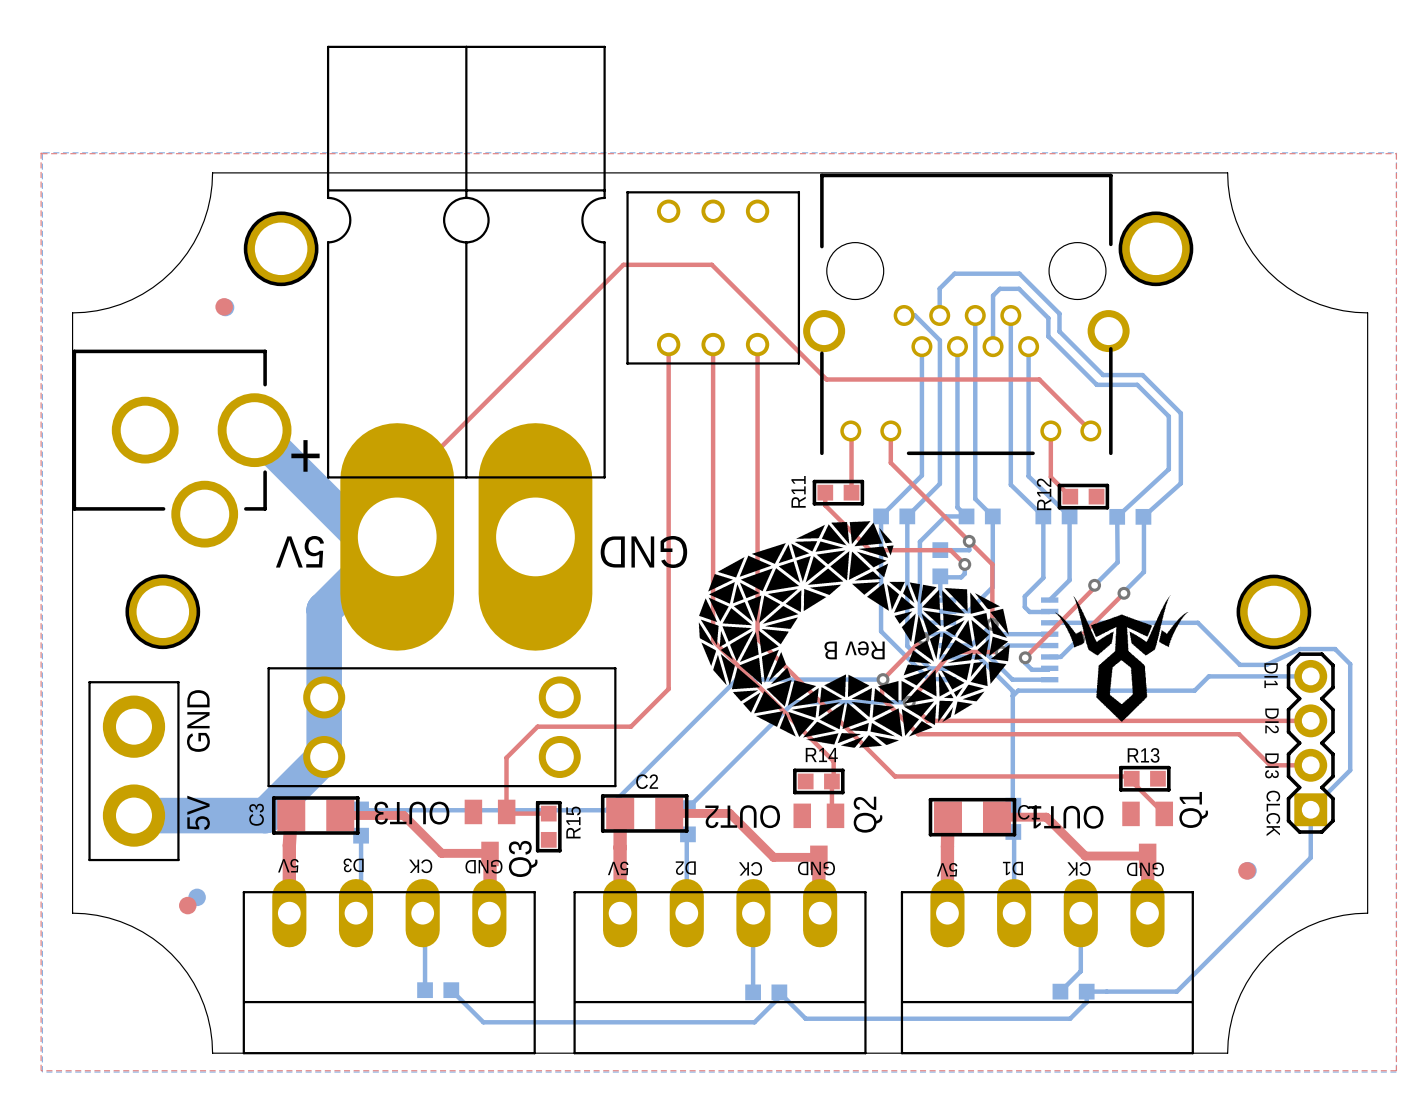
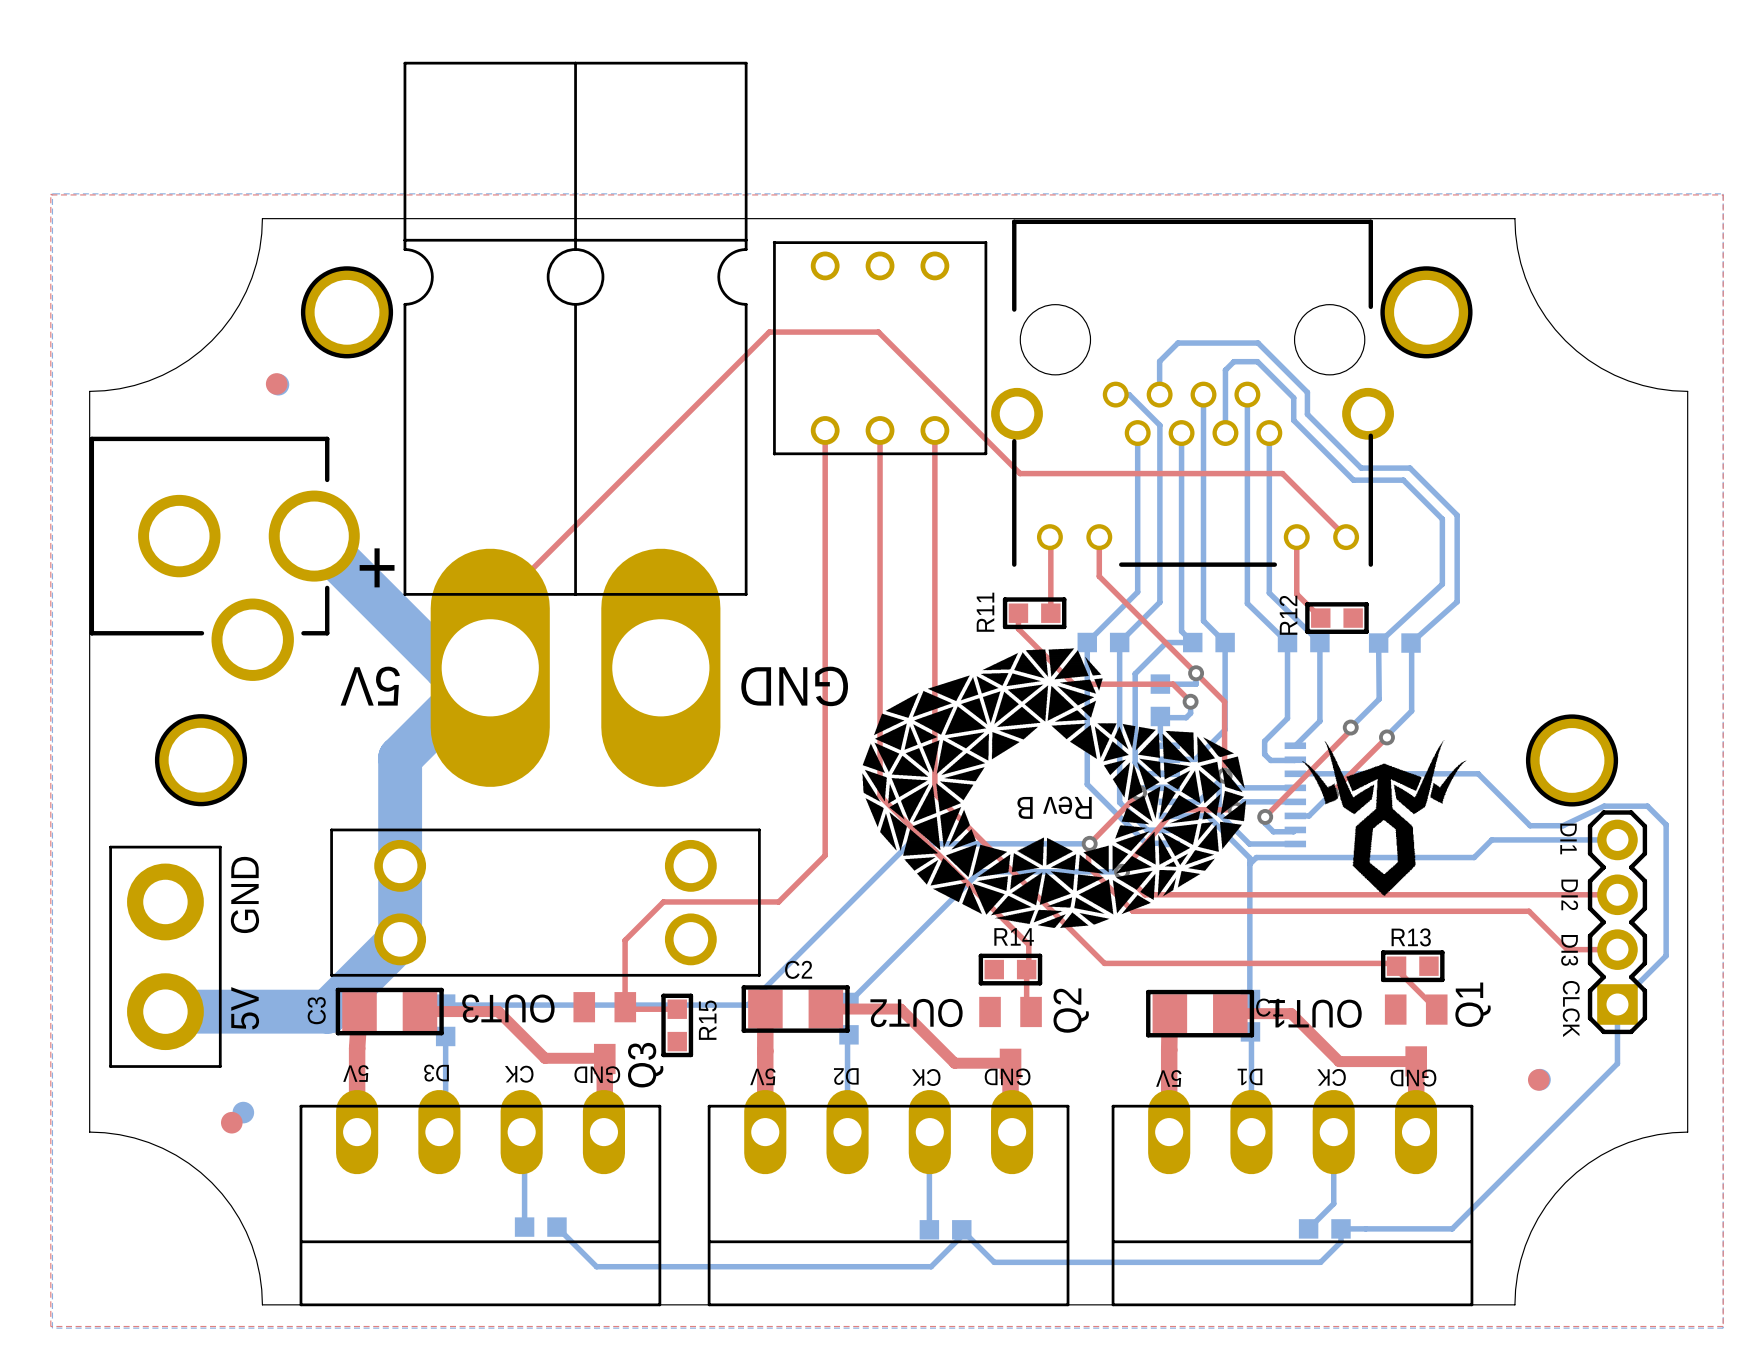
part footprint: [326, 45, 606, 651] -> [403, 61, 748, 787]

